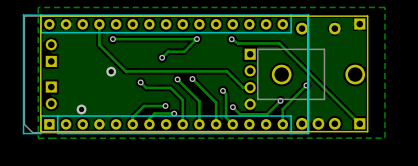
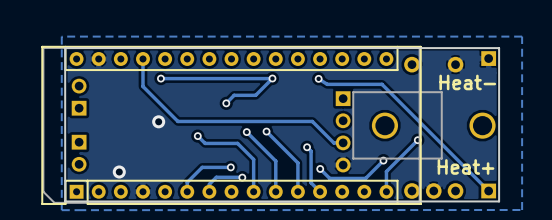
text: none -> Heat- (467, 82)
text: none -> Heat+ (466, 166)

